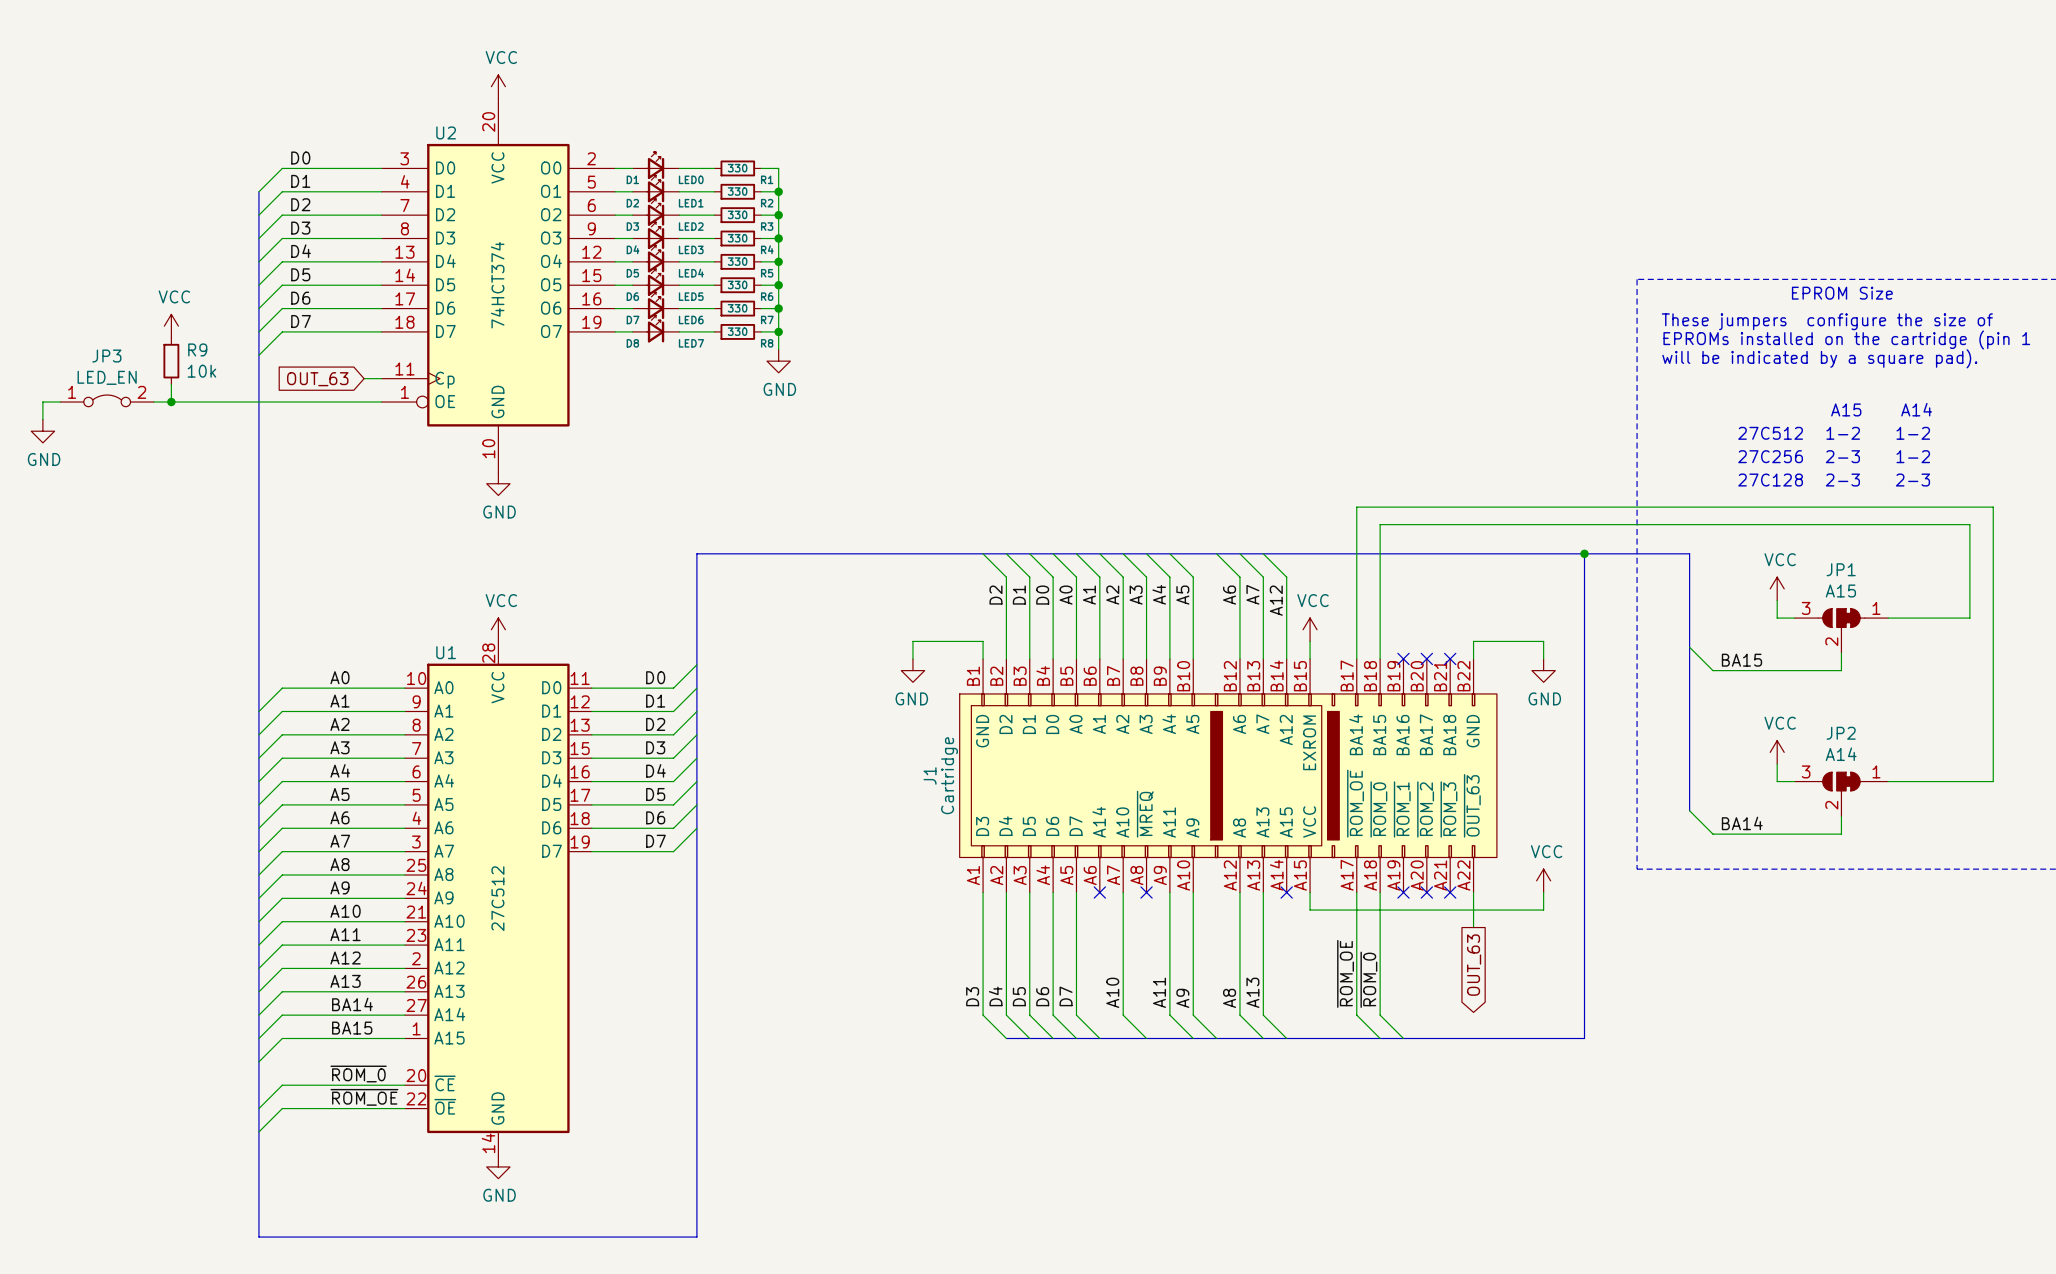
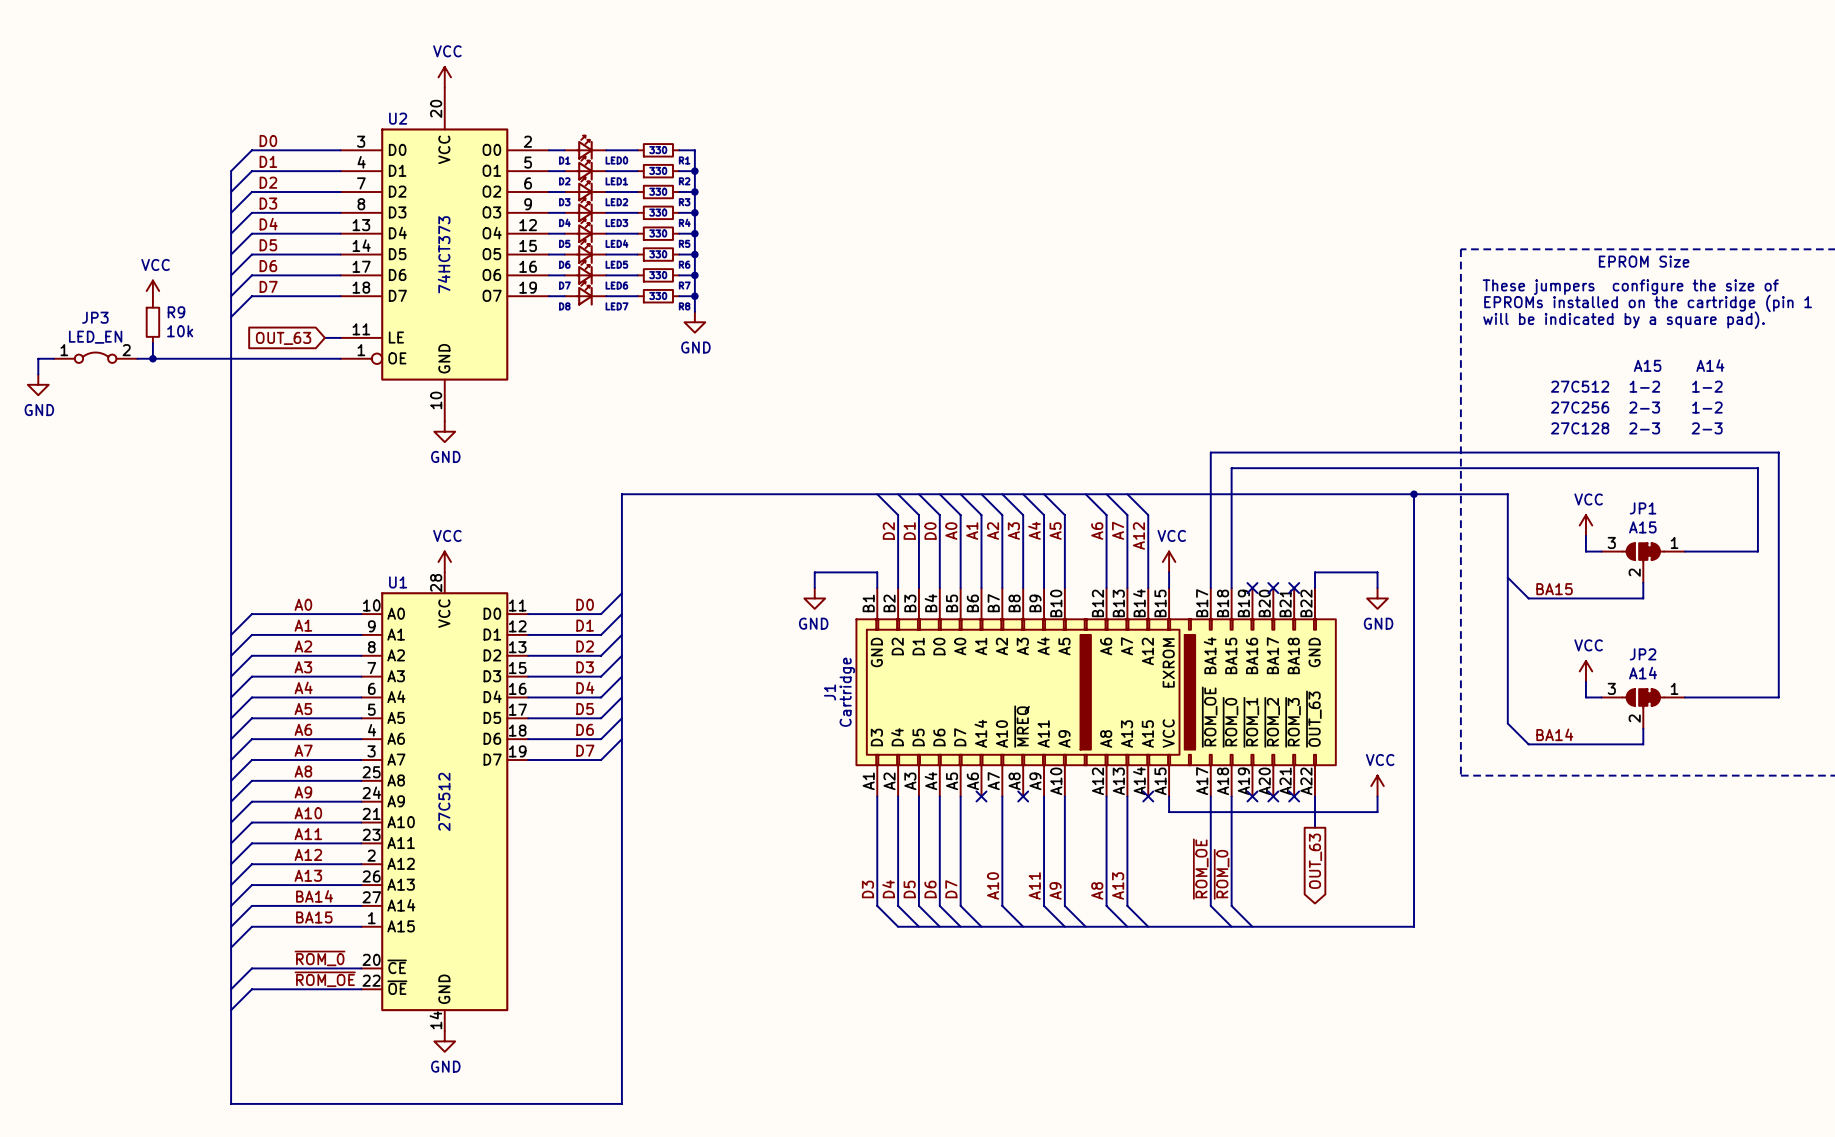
U2 symbol: [381, 98, 616, 473] -> [340, 87, 549, 422]
U2 value: 74HCT374 (497, 285) -> 74HCT373 (444, 254)

